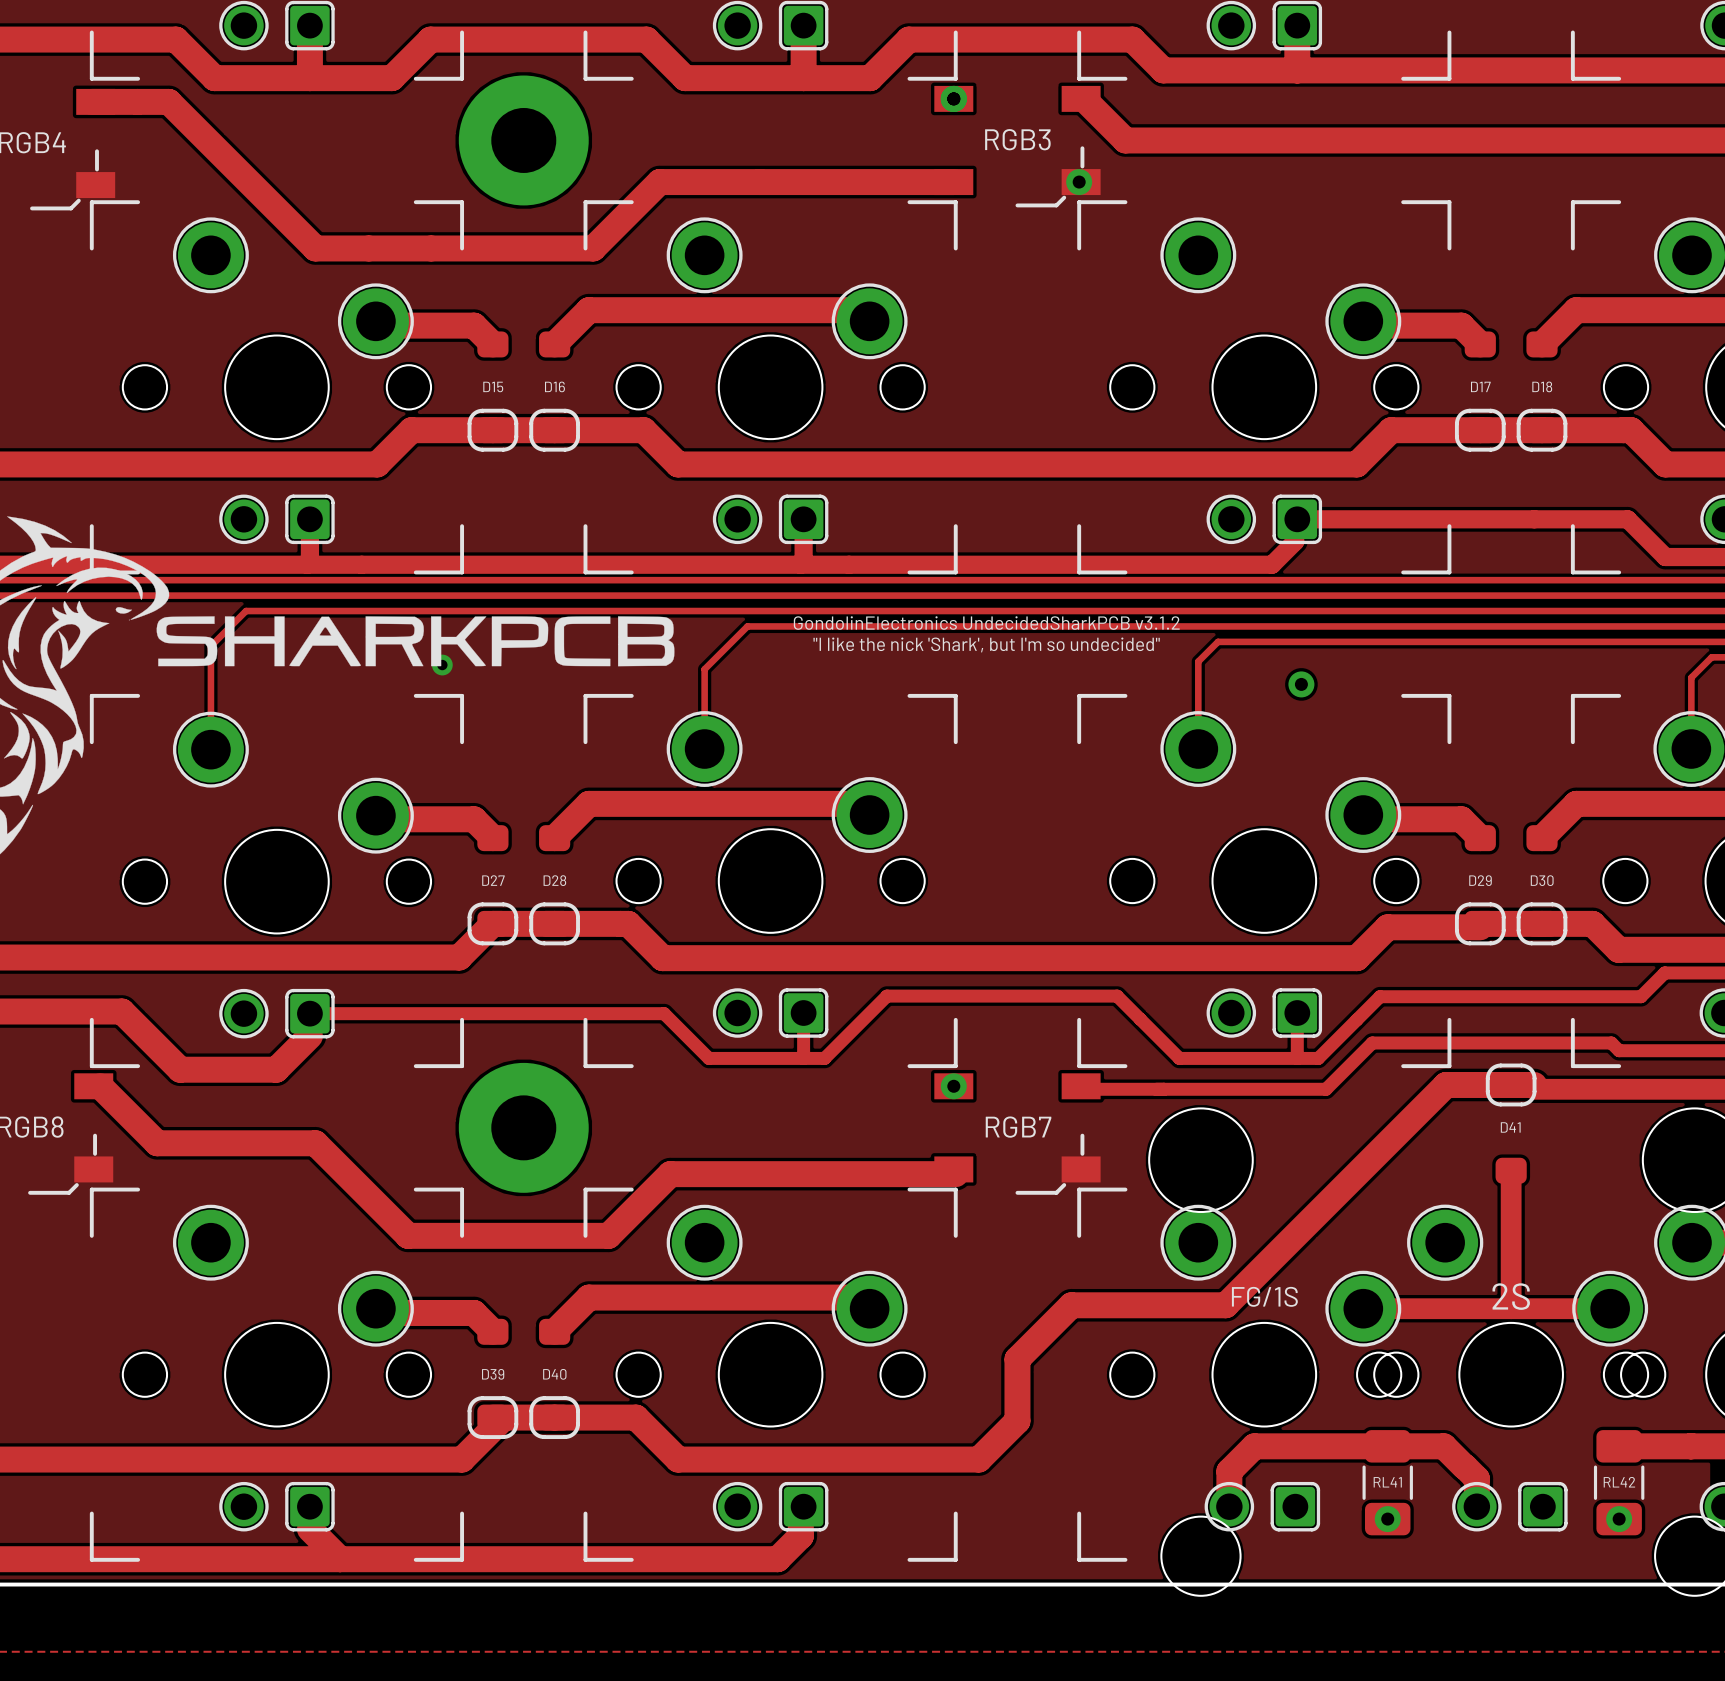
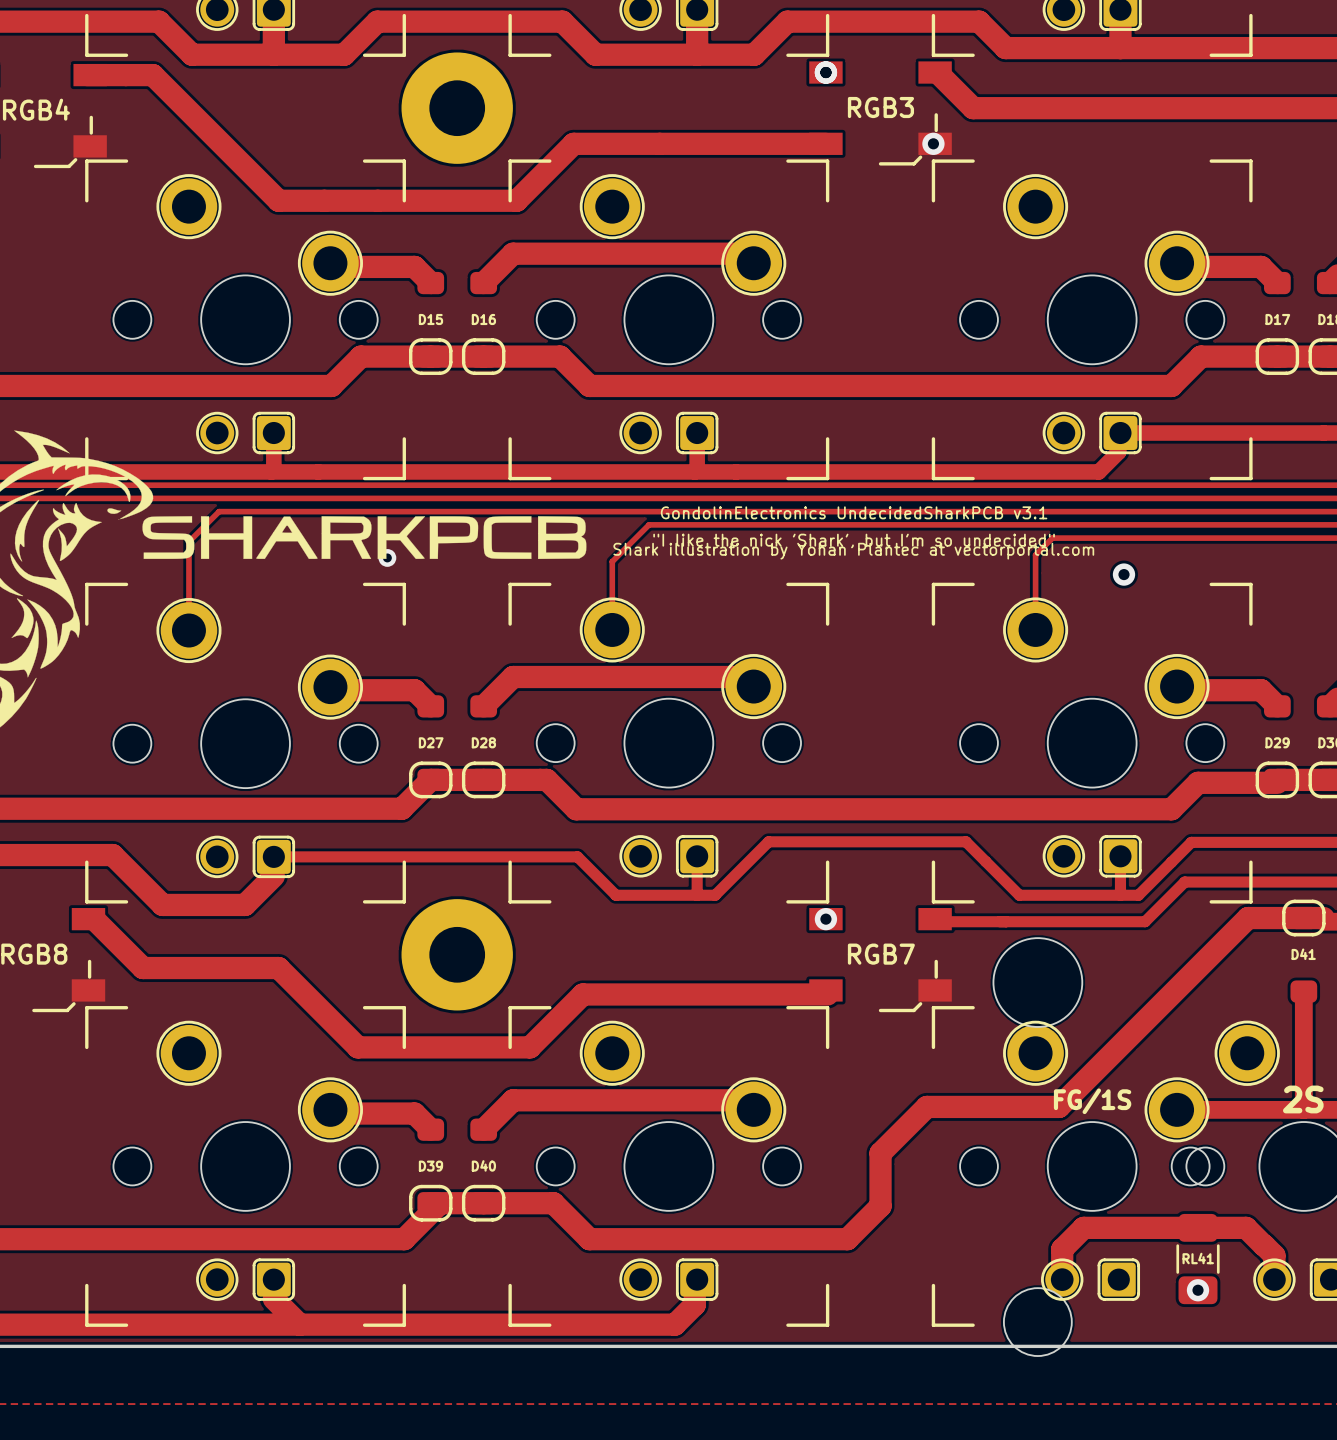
text: GondolinElectronics UndecidedSharkPCB v3.1.2 (986, 623) -> GondolinElectronics UndecidedSharkPCB v3.1 (854, 512)
text: none -> Shark illustration by Yohan Plantec at vectorportal.com (853, 551)

